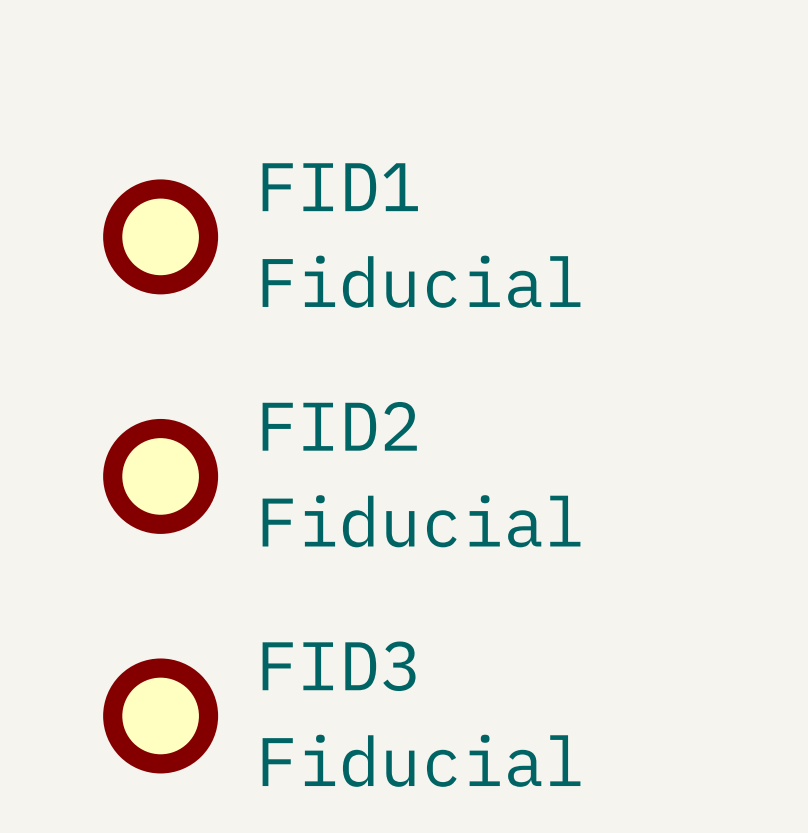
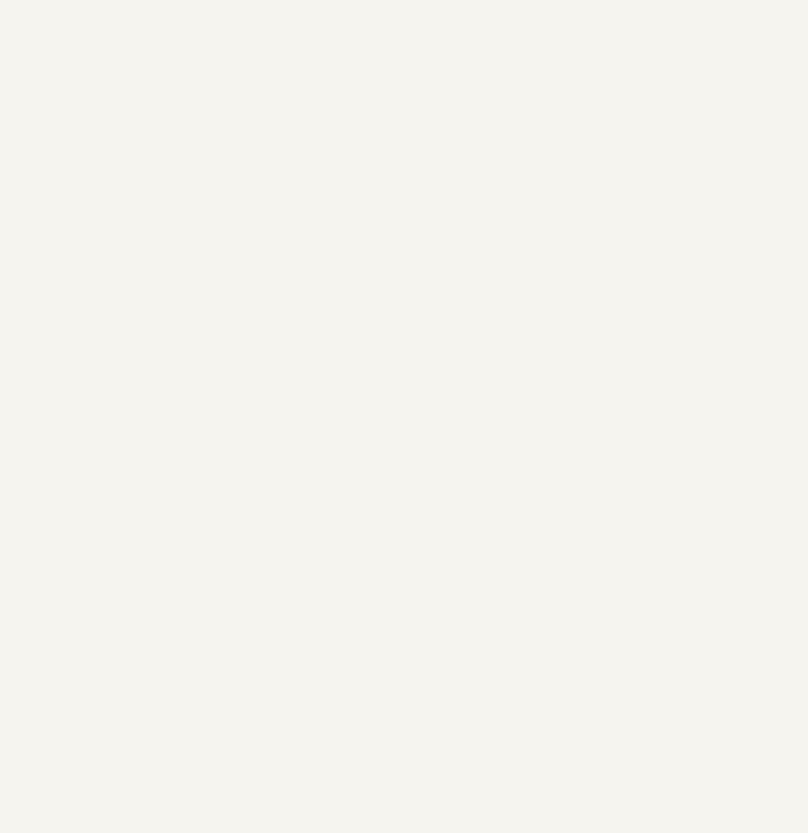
FID1: Fiducial (160, 236) -> none
FID2: Fiducial (160, 476) -> none
FID3: Fiducial (160, 715) -> none

